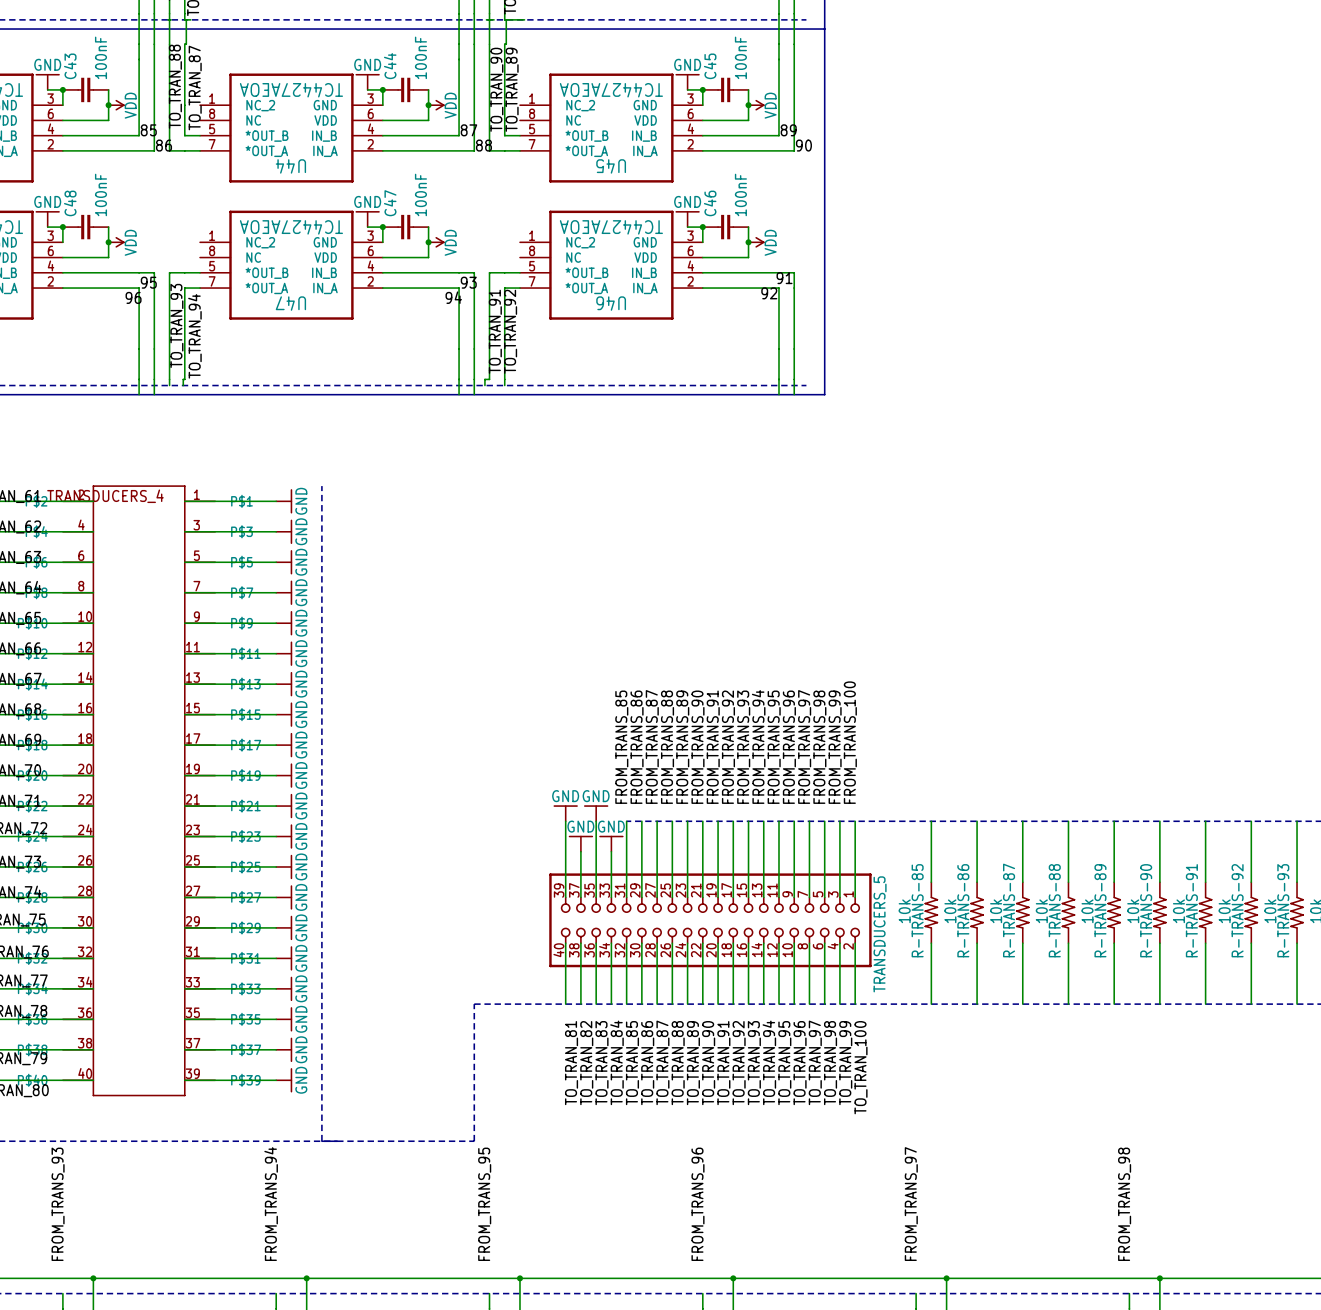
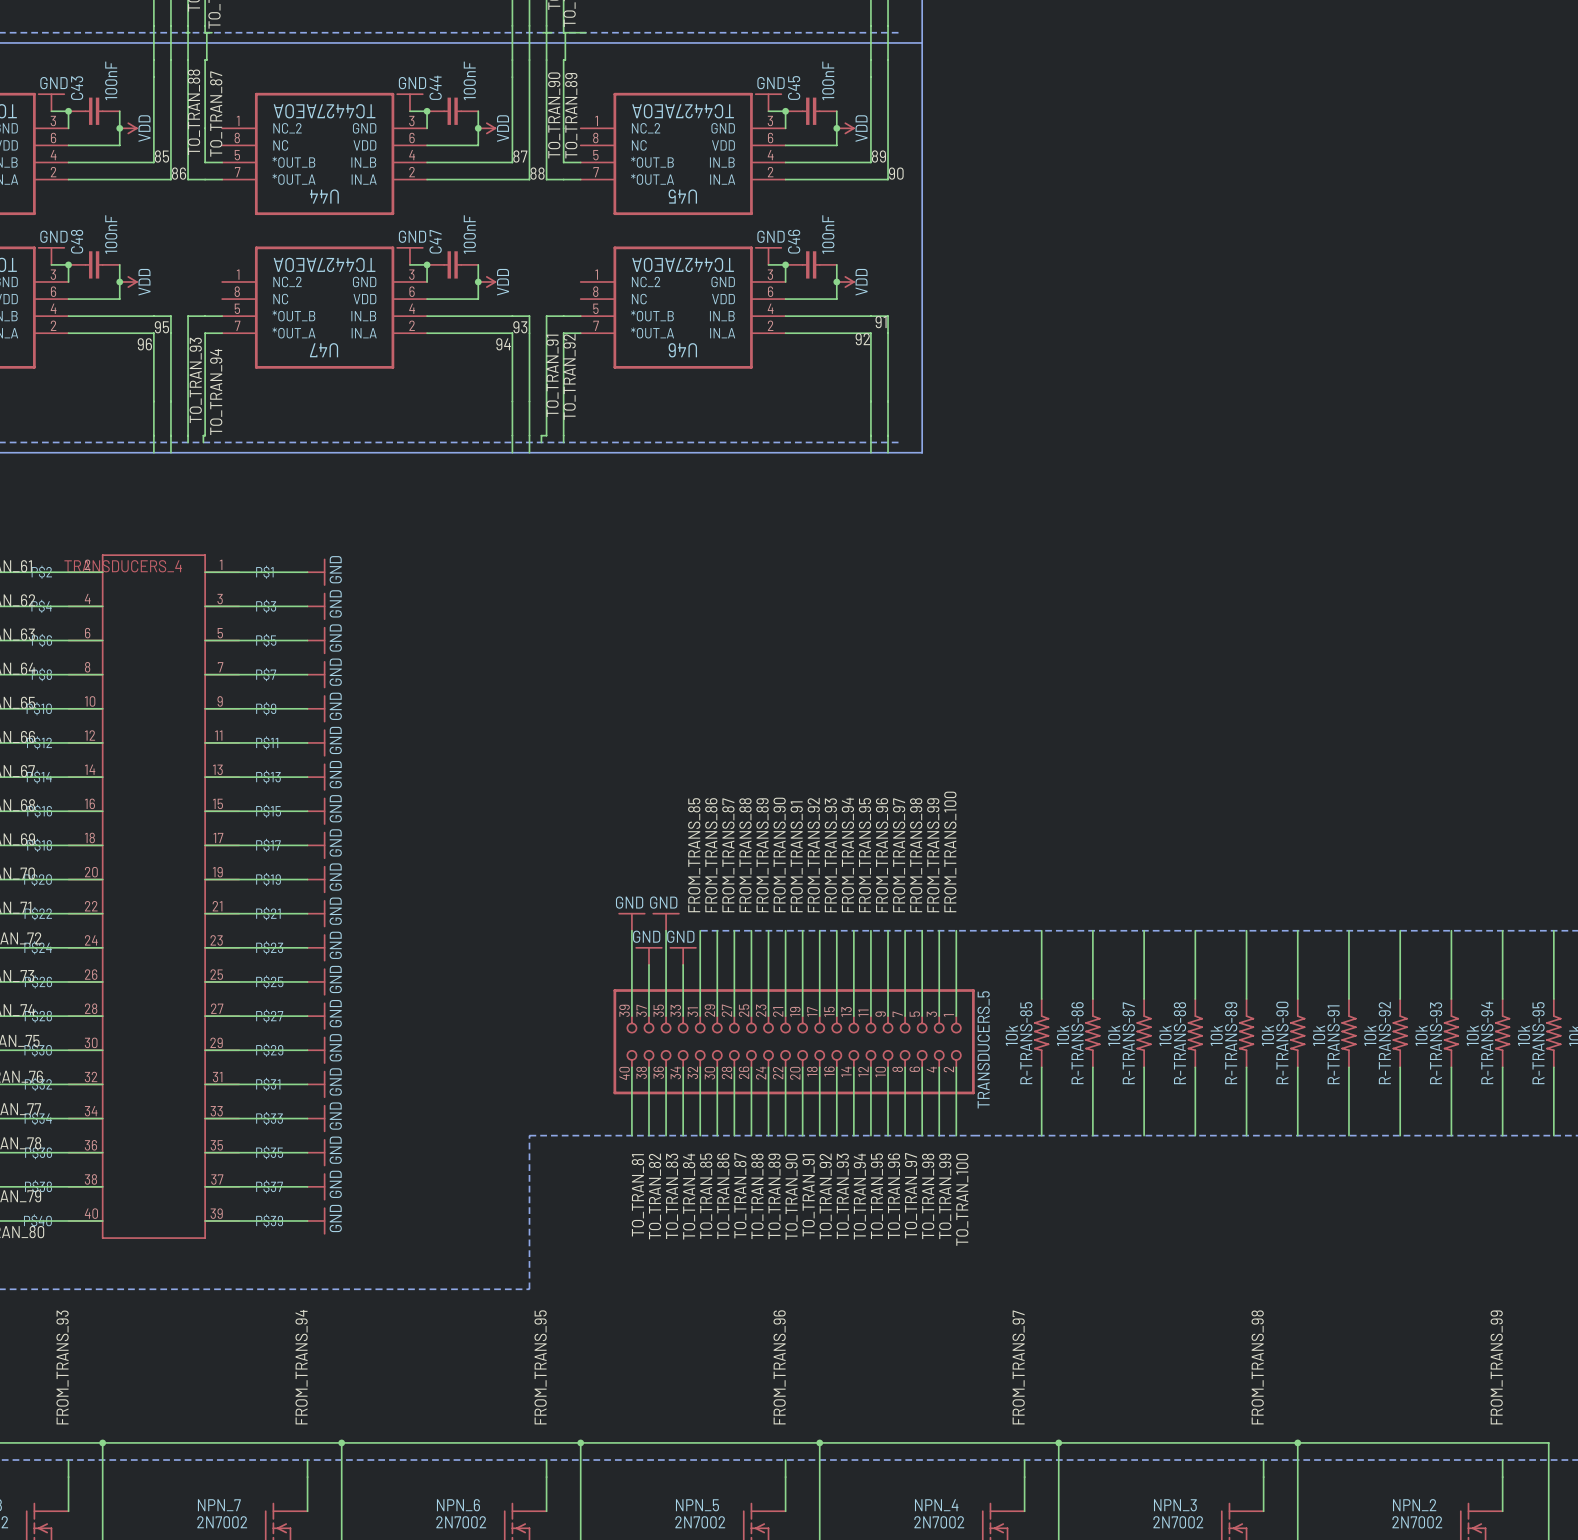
bus: (321, 486) (321, 1141) (337, 1141) -> none

